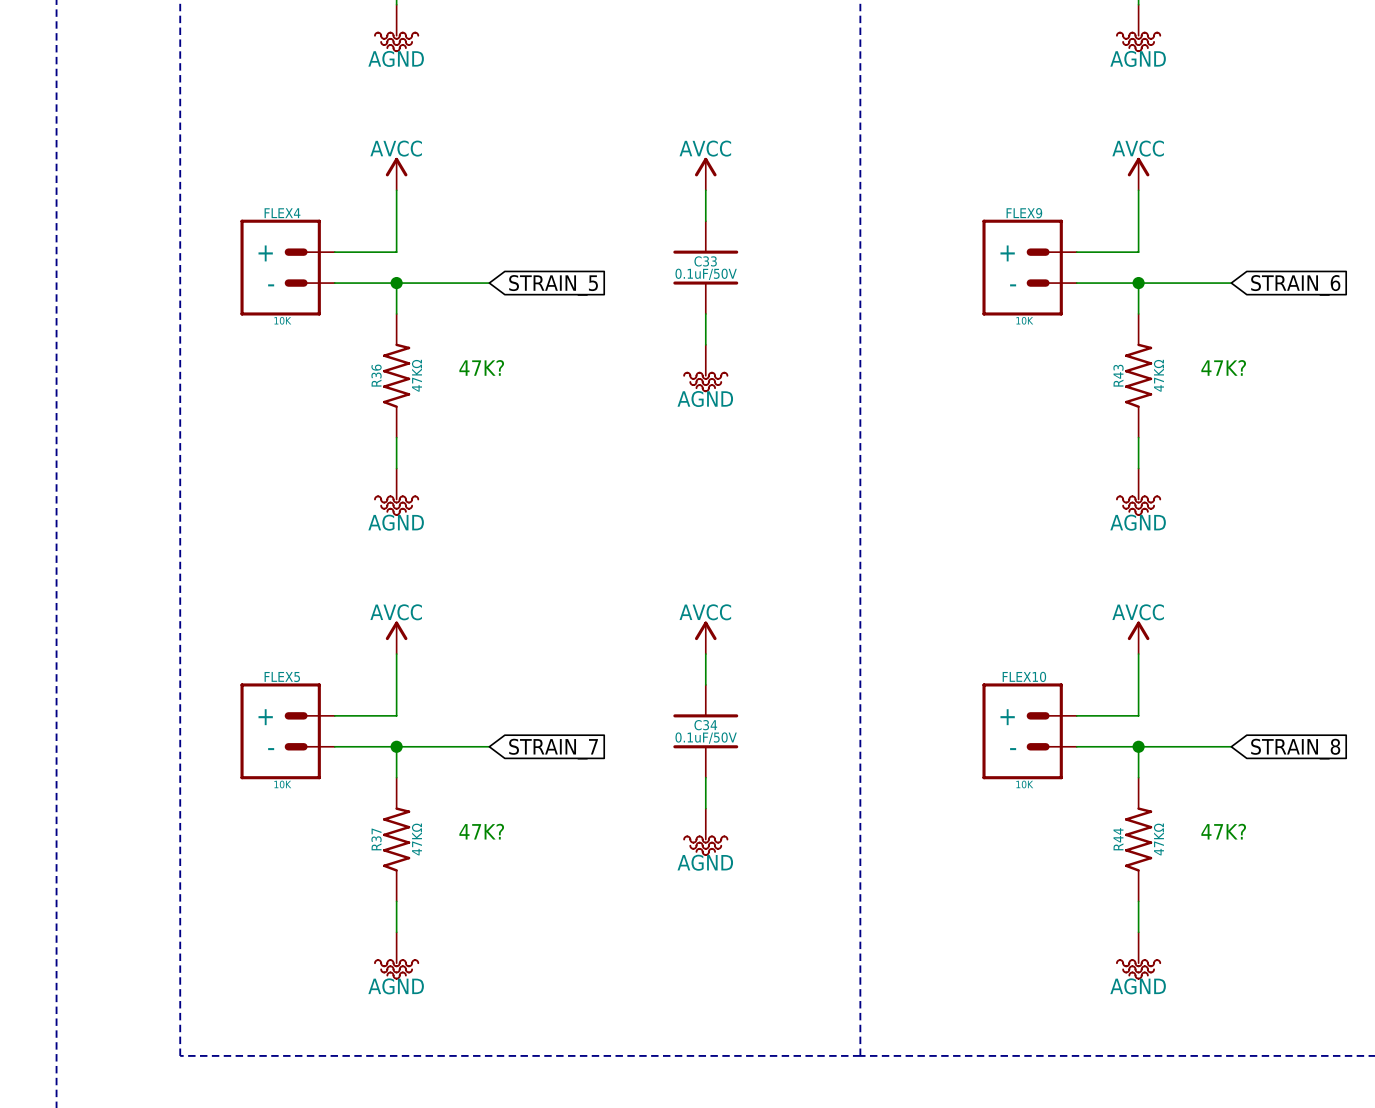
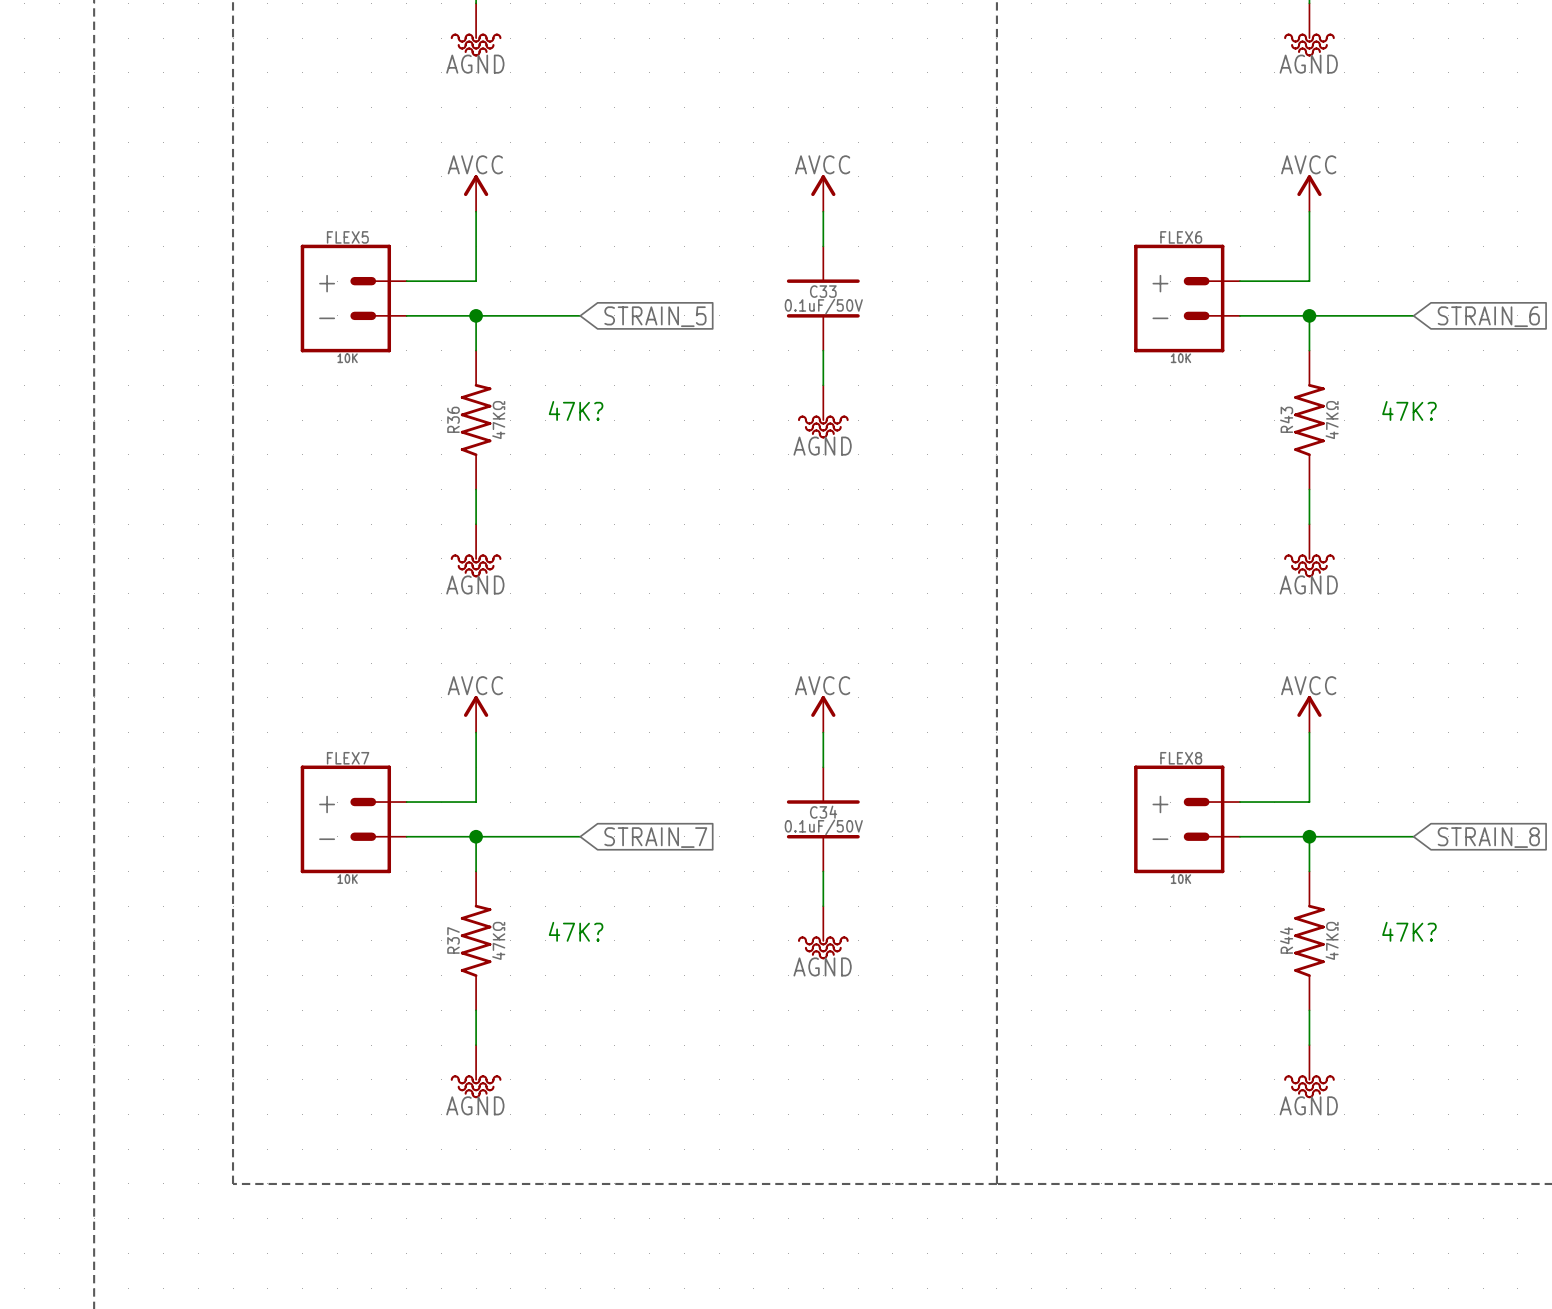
FLEX4 name: FLEX4 (282, 213) -> FLEX5 (347, 237)
FLEX9 name: FLEX9 (1024, 213) -> FLEX6 (1181, 237)
FLEX10 name: FLEX10 (1024, 676) -> FLEX8 (1181, 758)
FLEX5 name: FLEX5 (282, 677) -> FLEX7 (348, 758)

